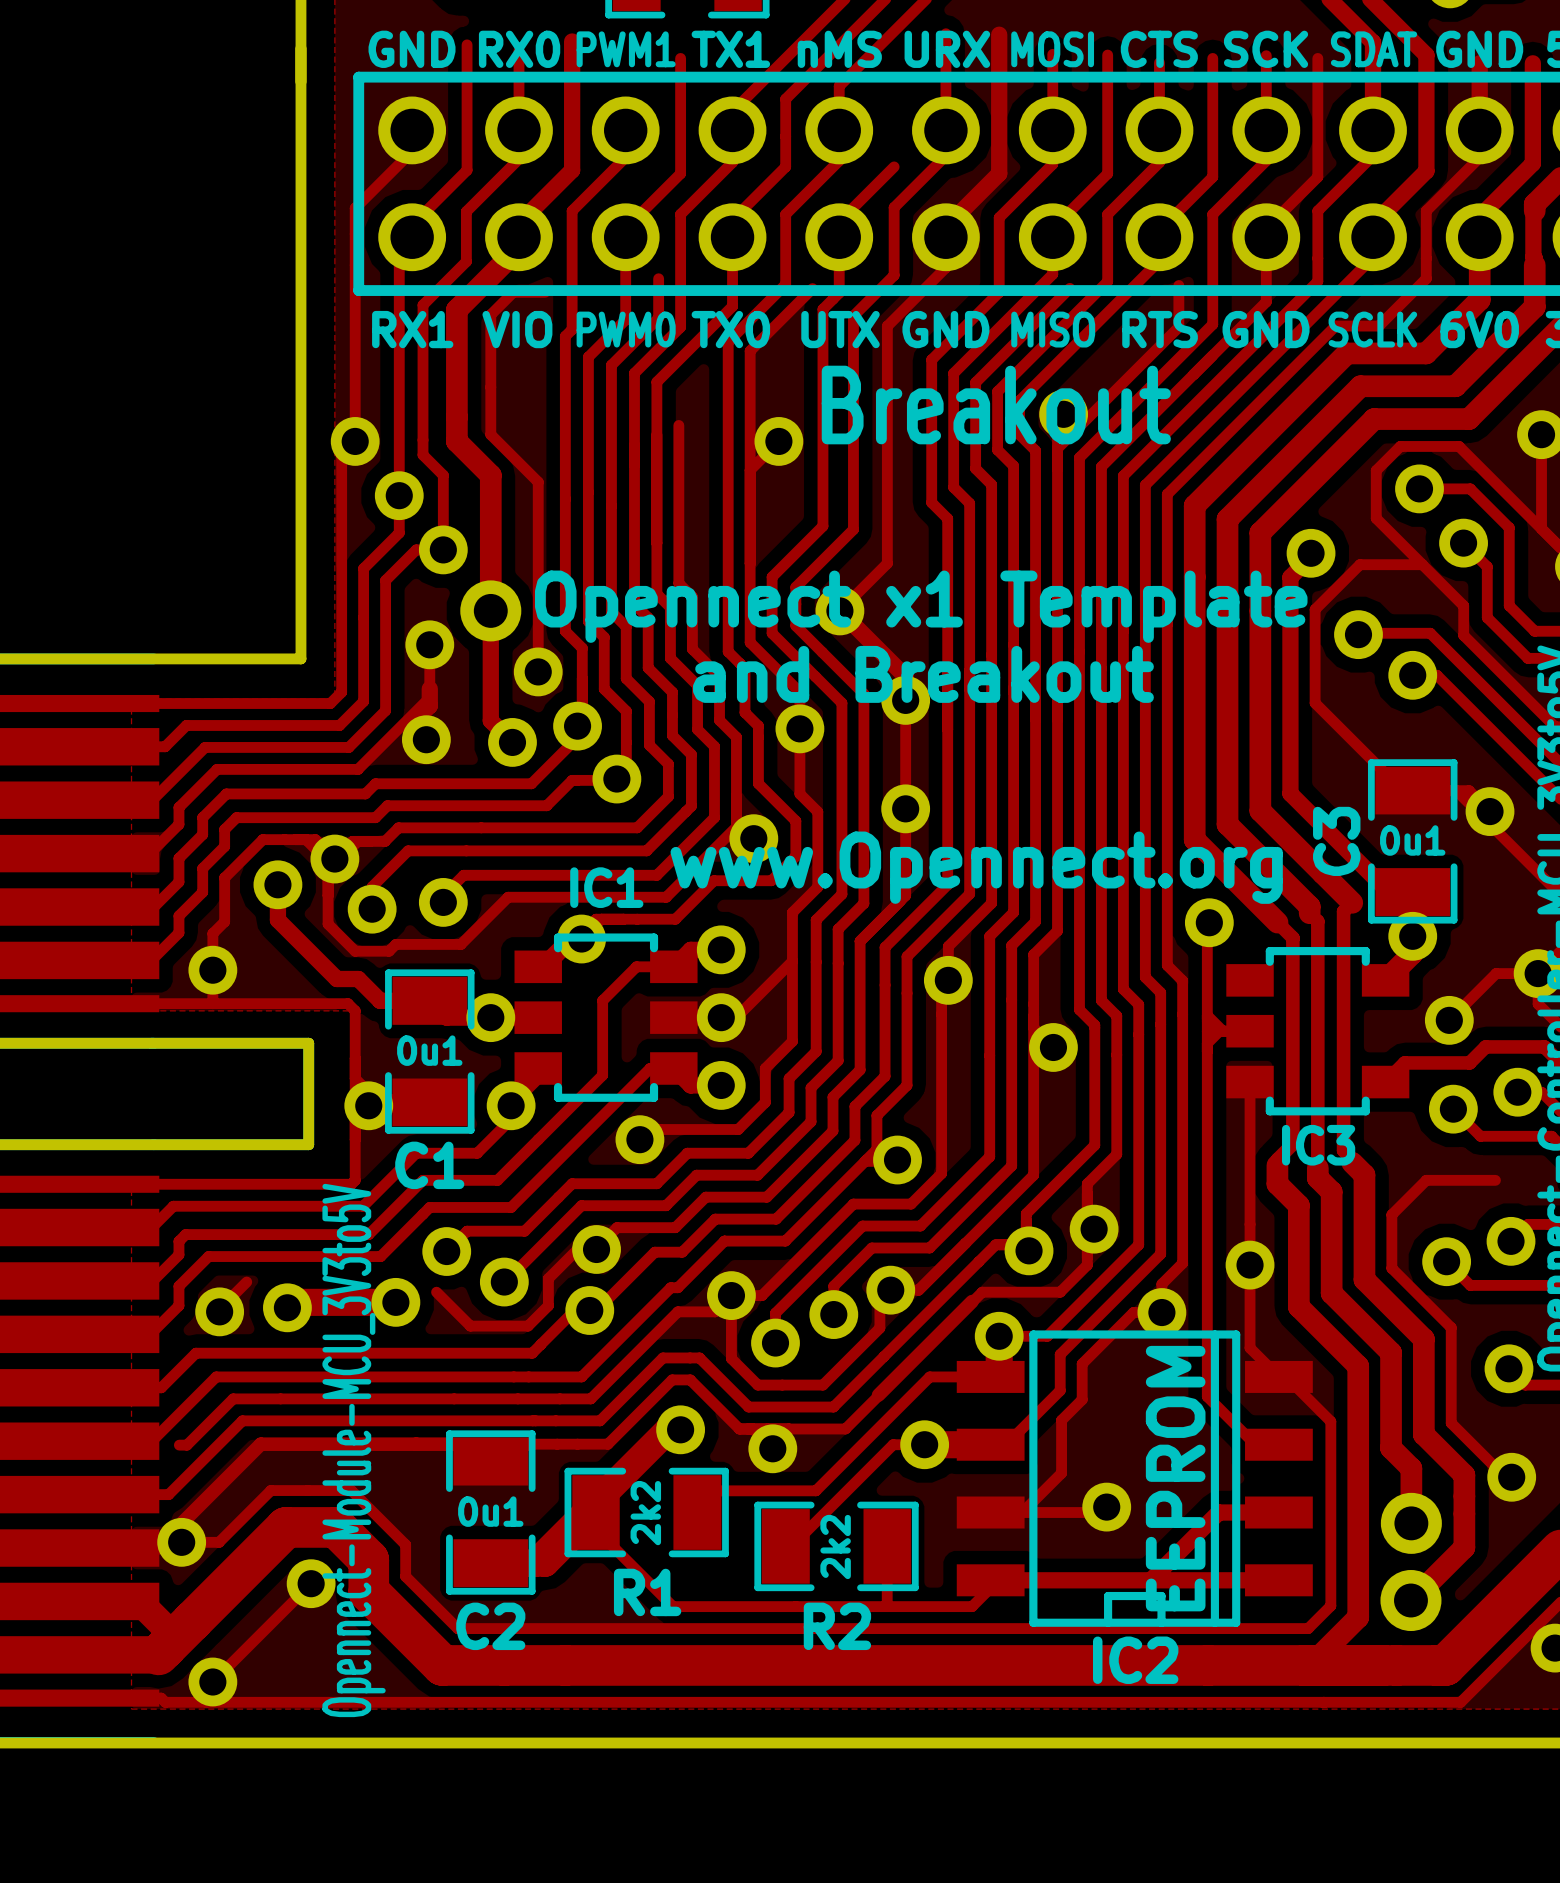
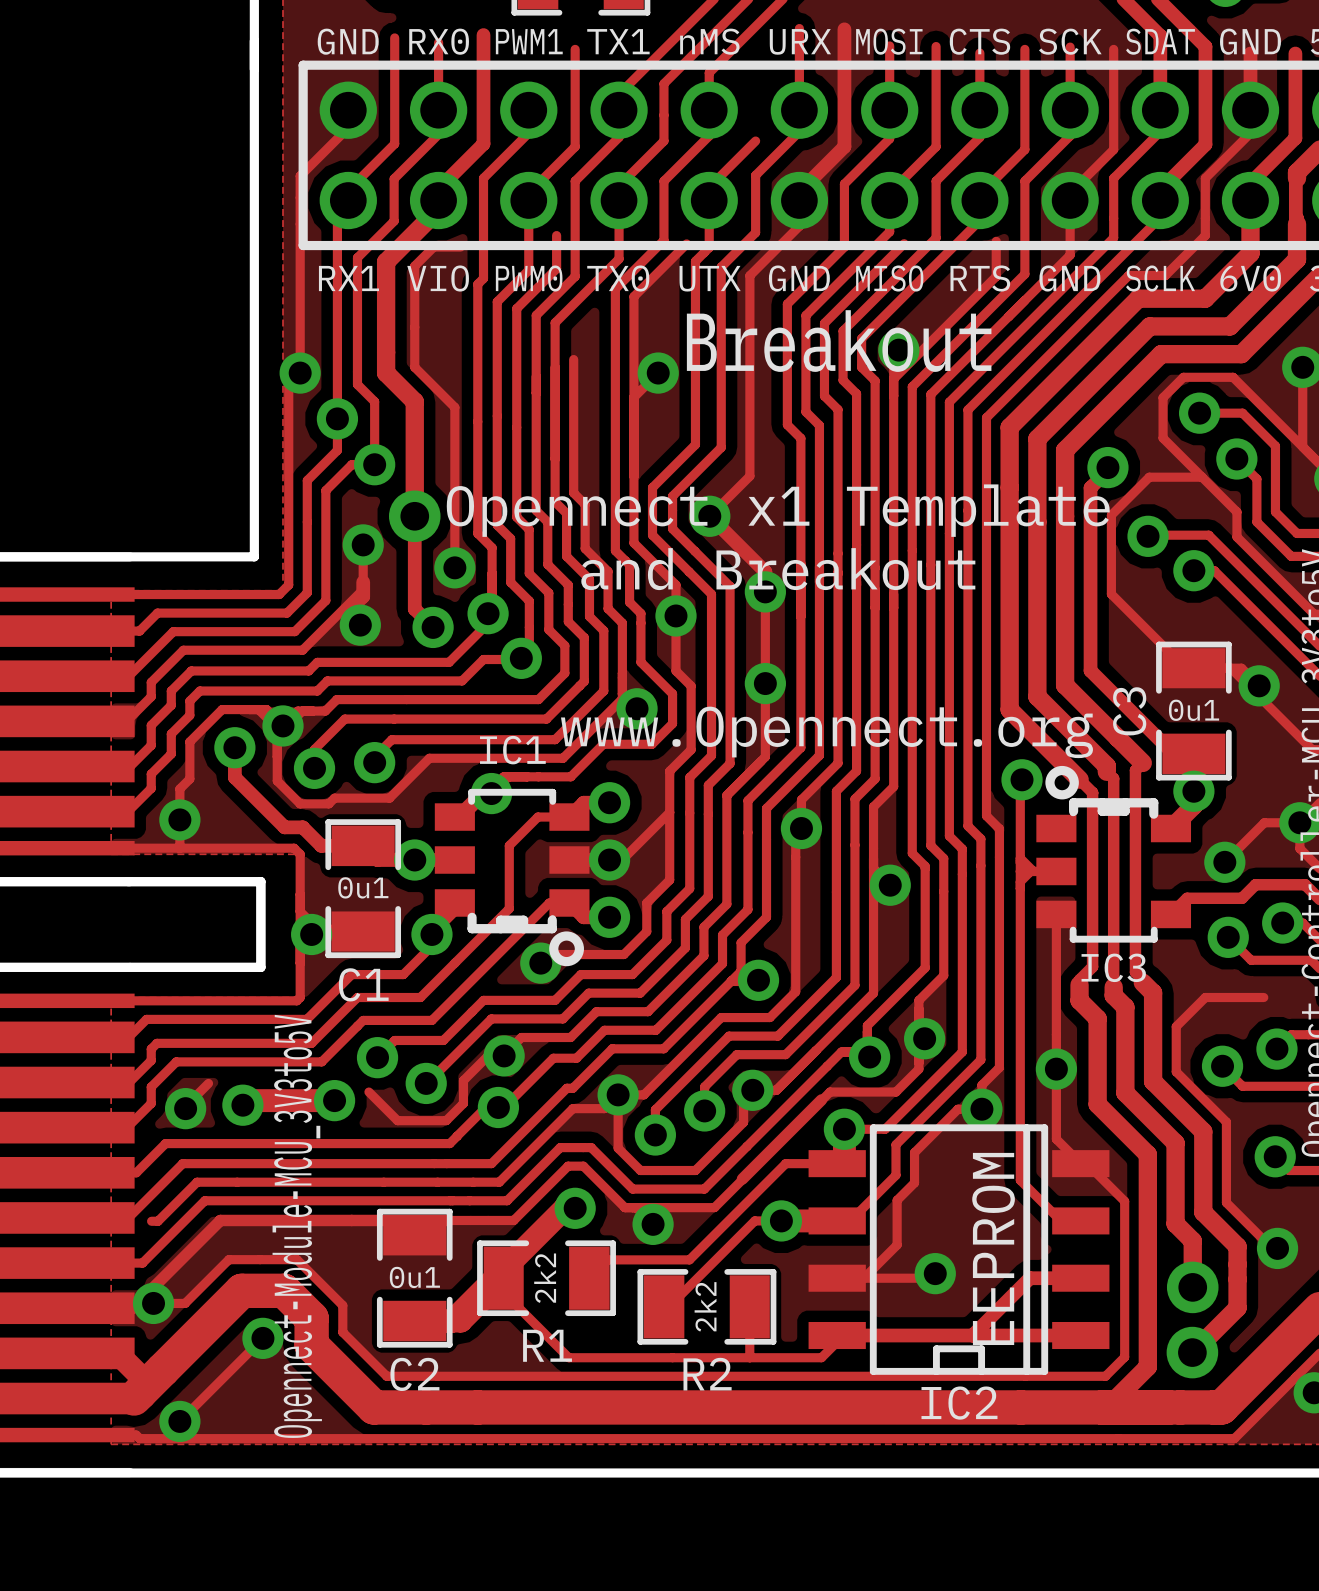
IC1 footprint: [514, 933, 698, 1102] -> [434, 788, 590, 967]
IC3 footprint: [1226, 947, 1410, 1116] -> [1036, 765, 1192, 943]

